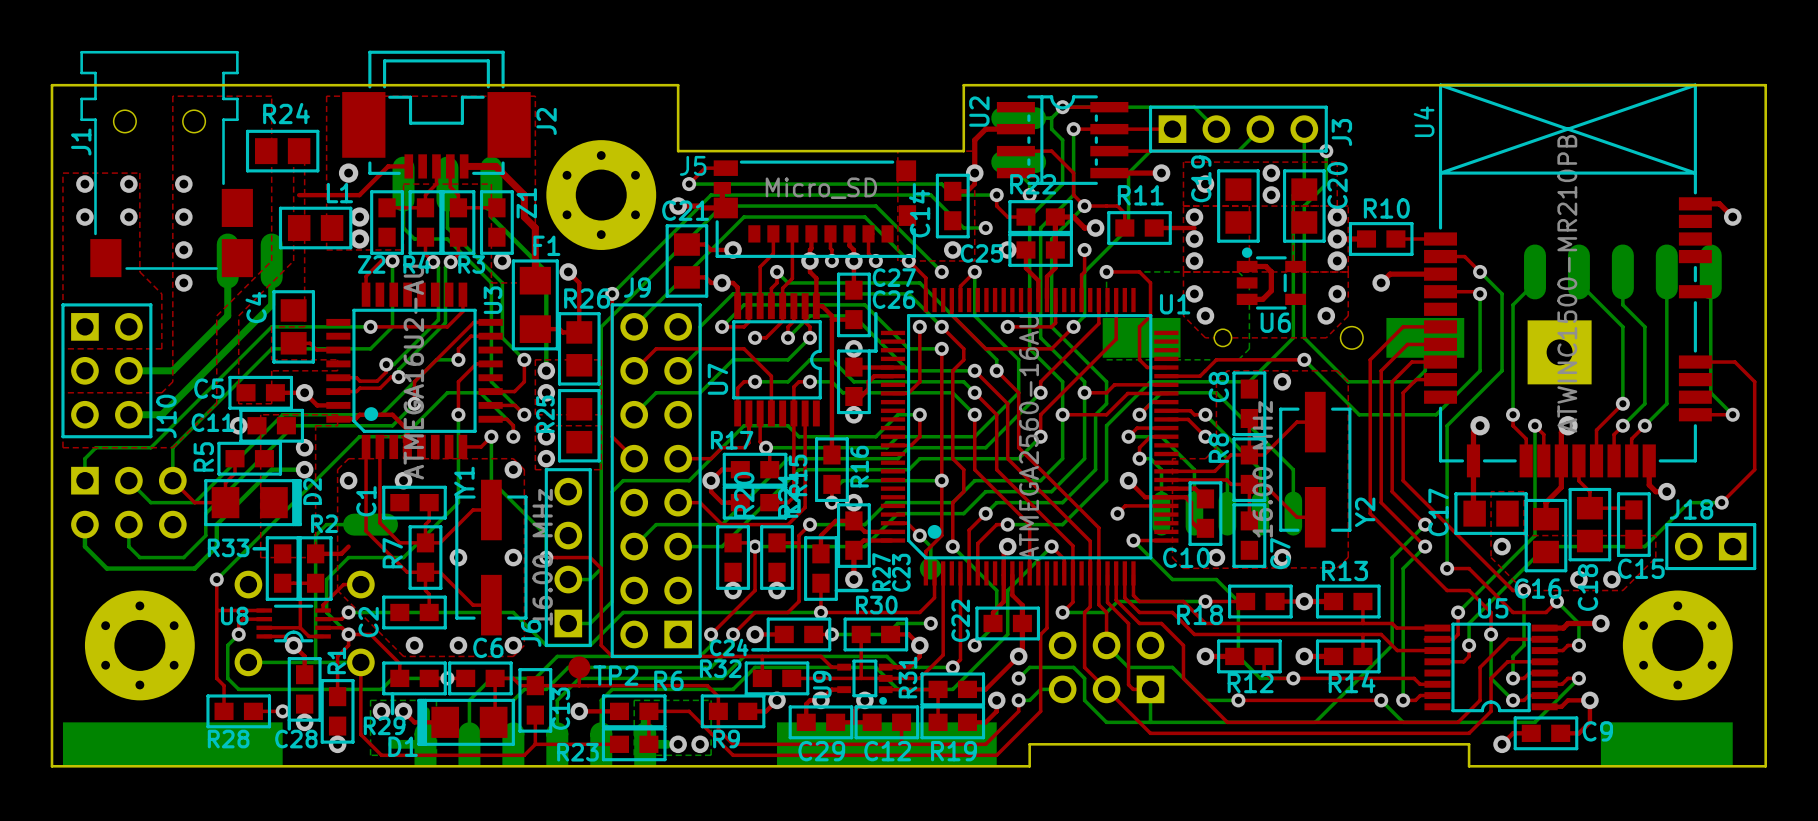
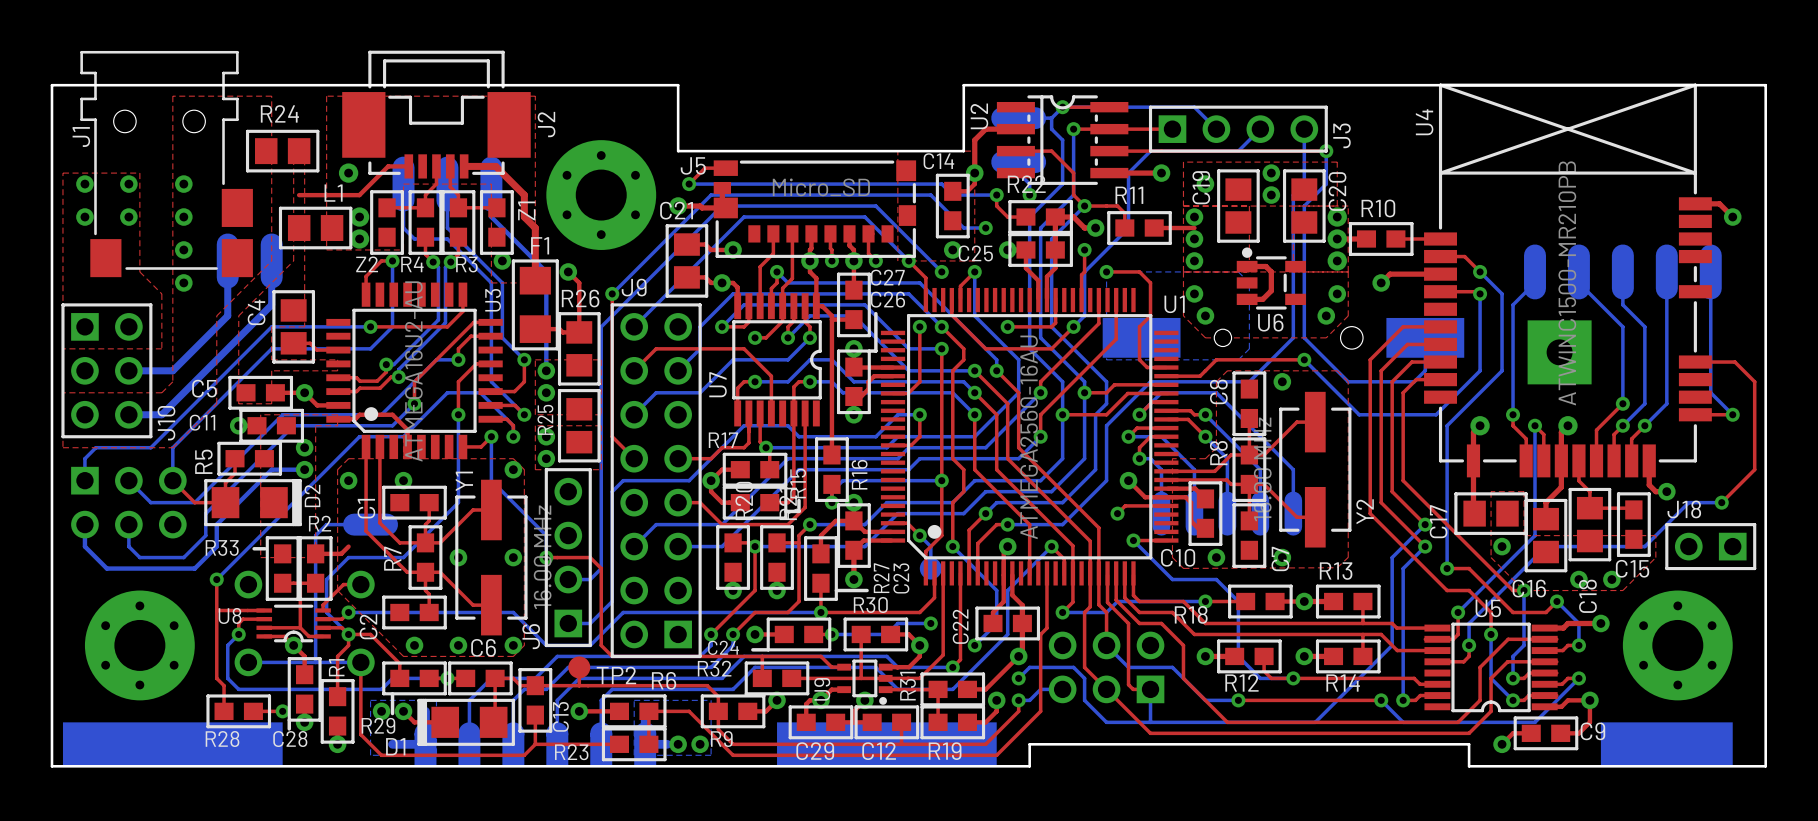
C14 name rotation: 0° (919, 213) -> 90° clockwise (938, 161)

